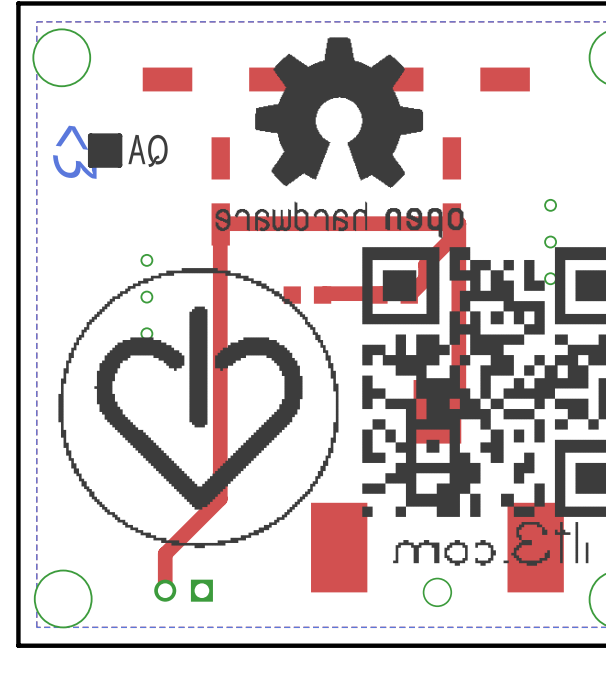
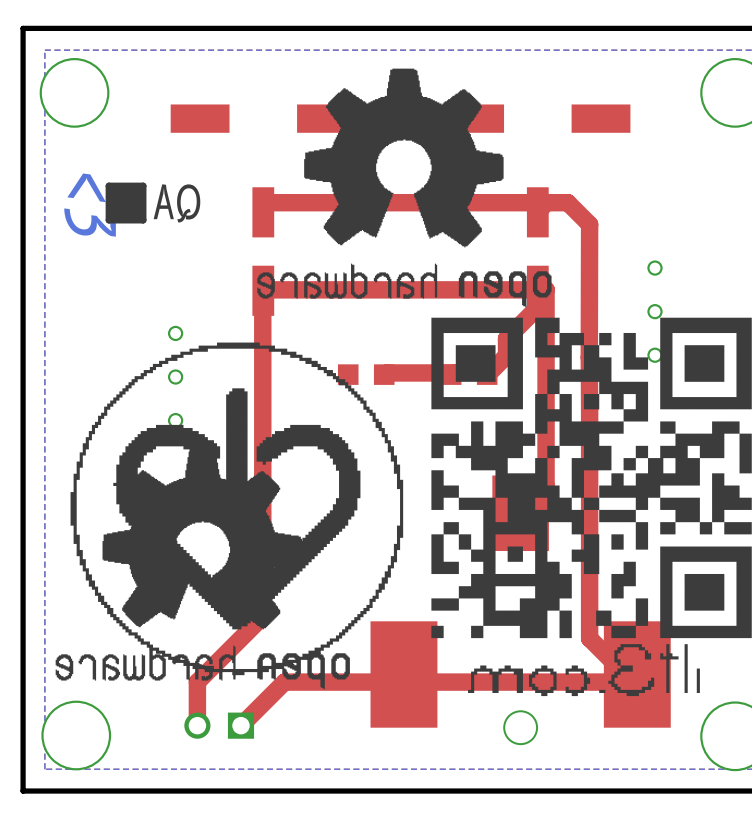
top track: none -> (263, 212) (262, 202) (567, 202) (589, 224) (589, 638) (633, 682) (284, 682) (240, 725)
drawing: none -> [55, 450, 350, 690]

